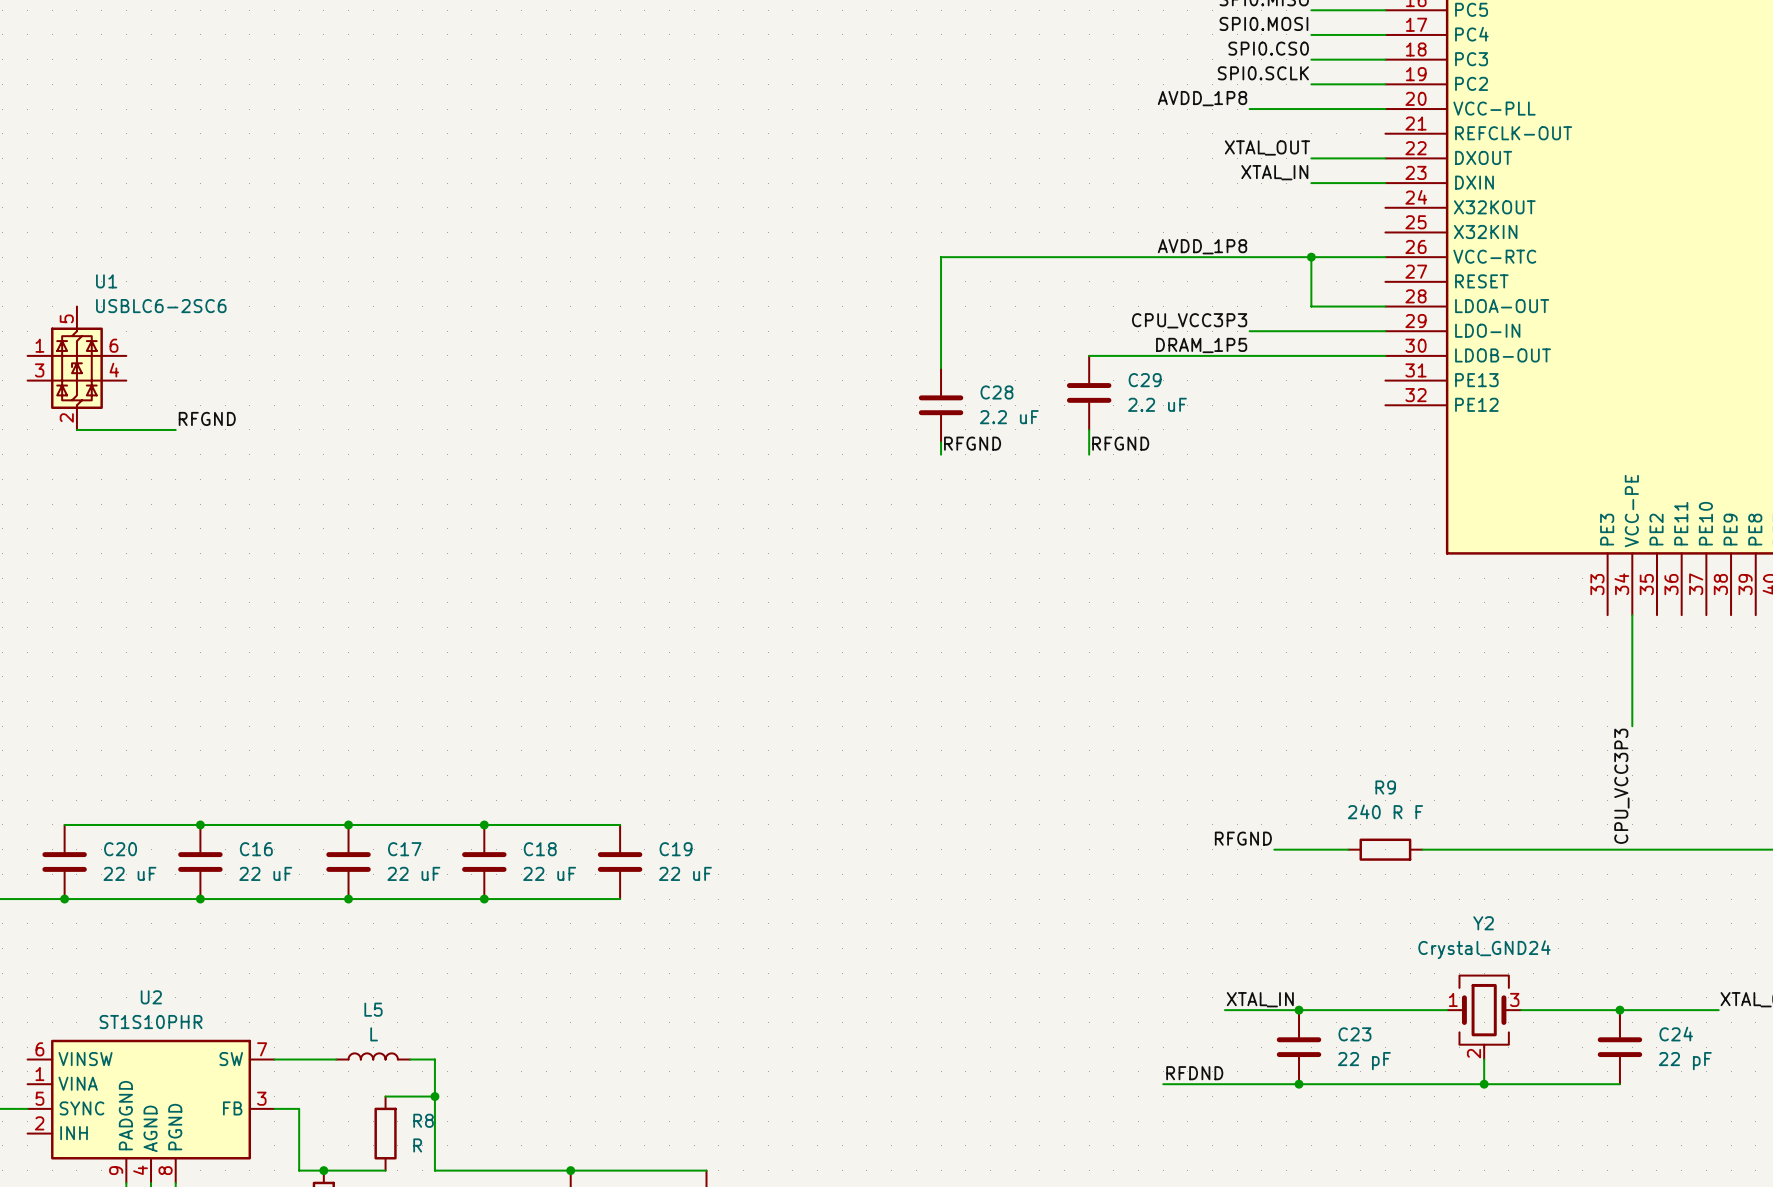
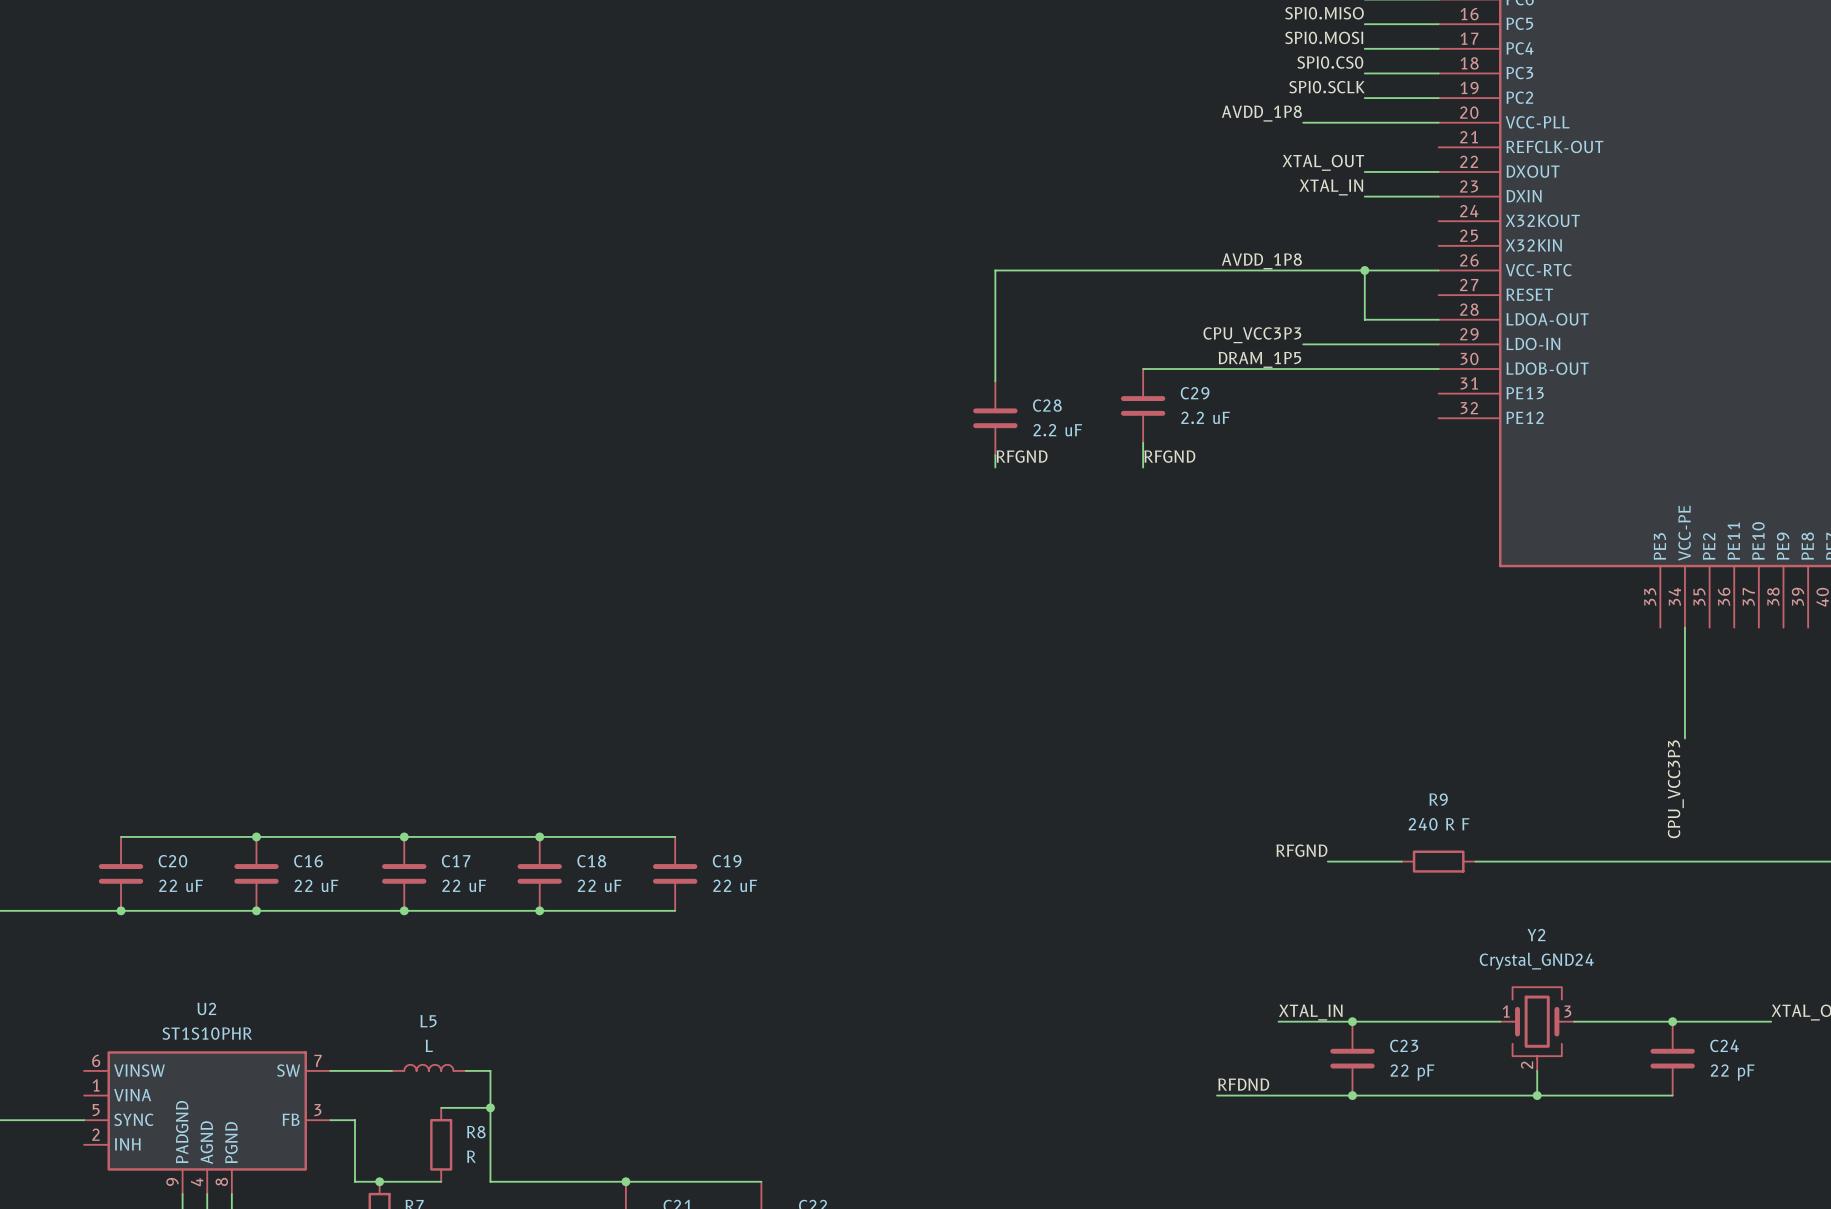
U1: USBLC6-2SC6 (76, 368) -> none
label: RFGND (207, 418) -> none
wire: (76, 429) (175, 429) -> none

